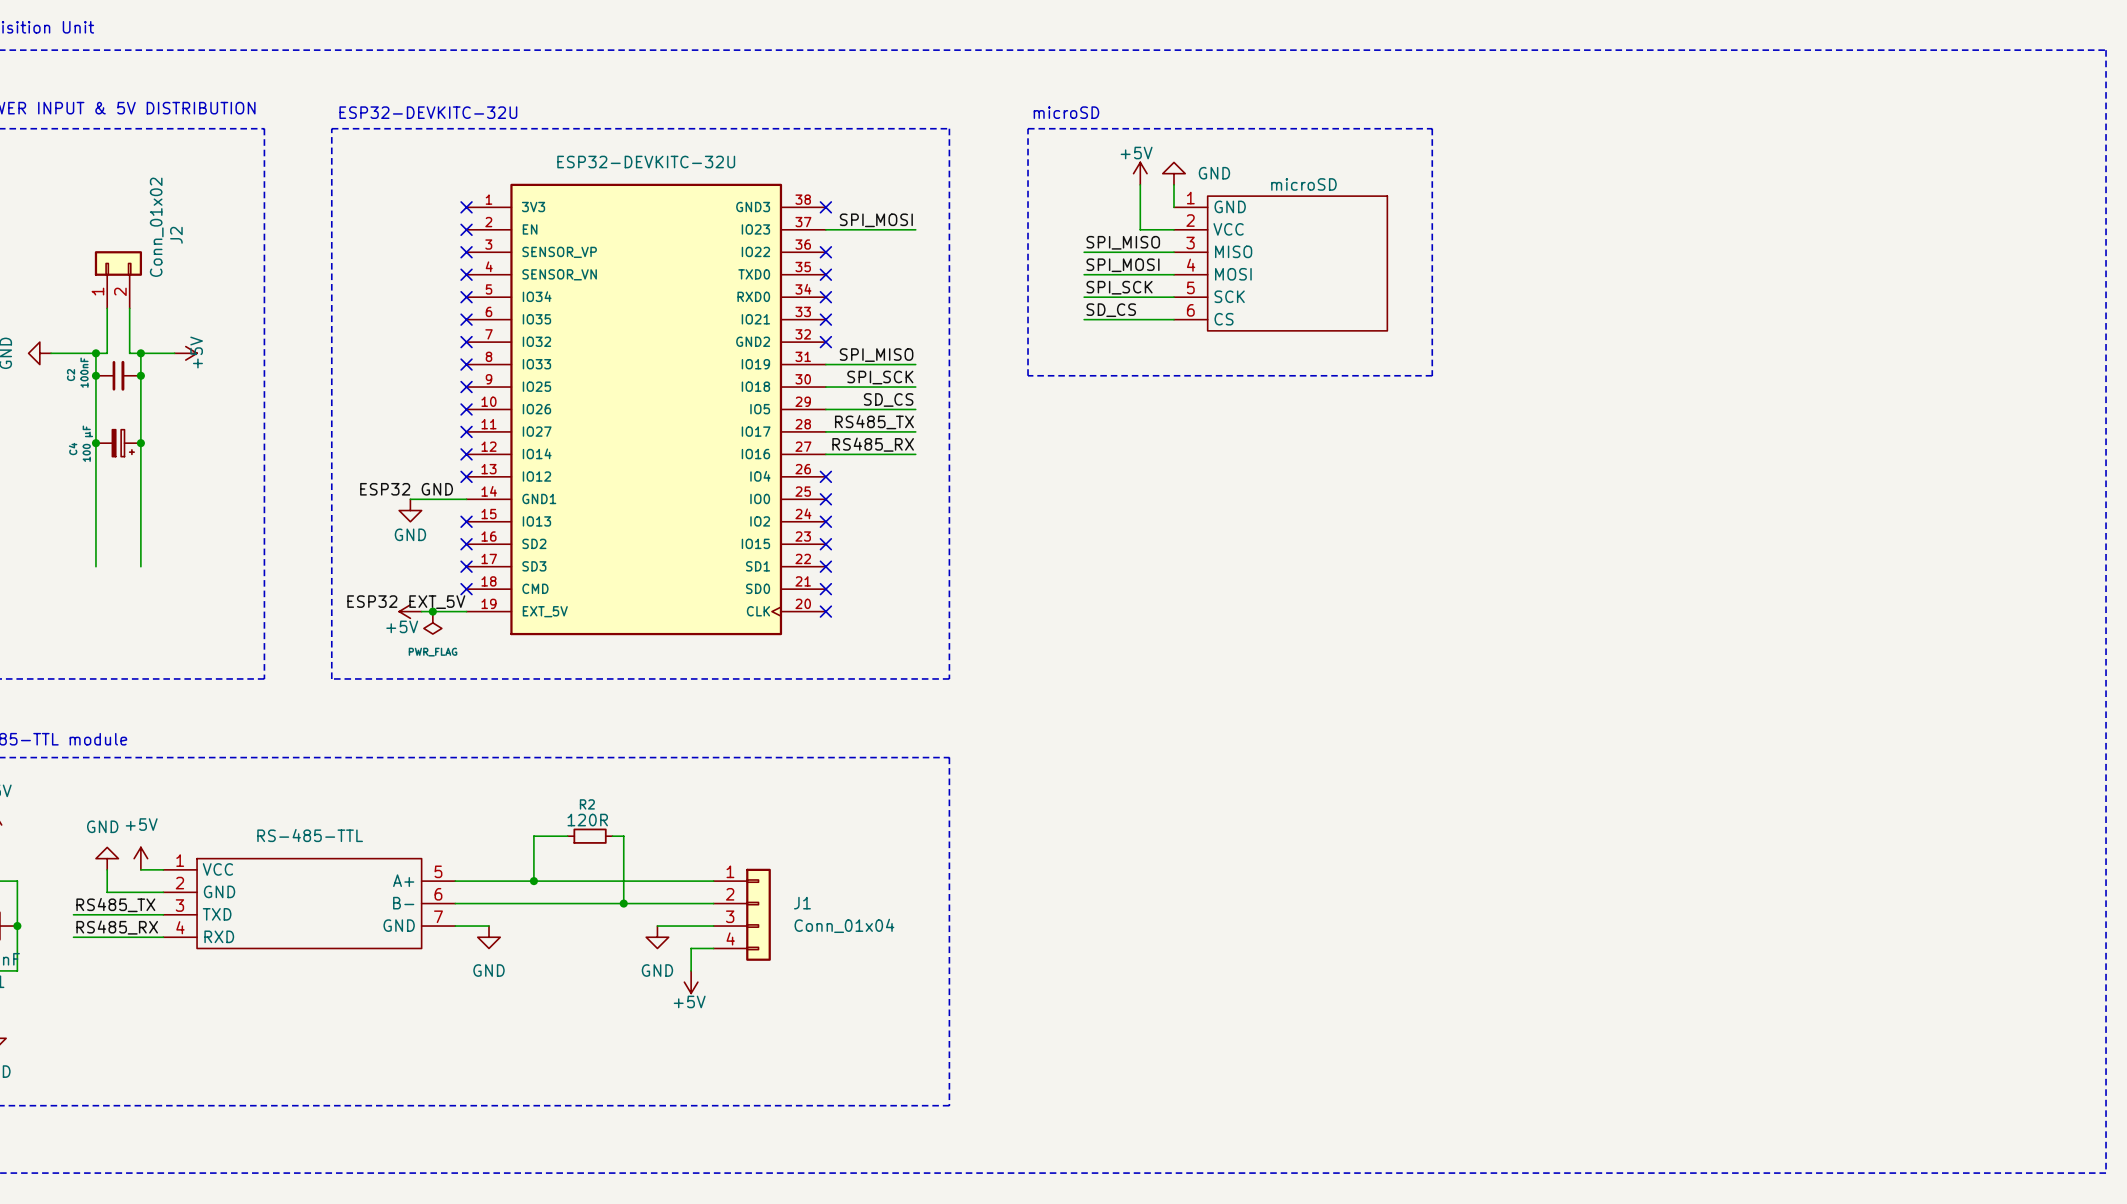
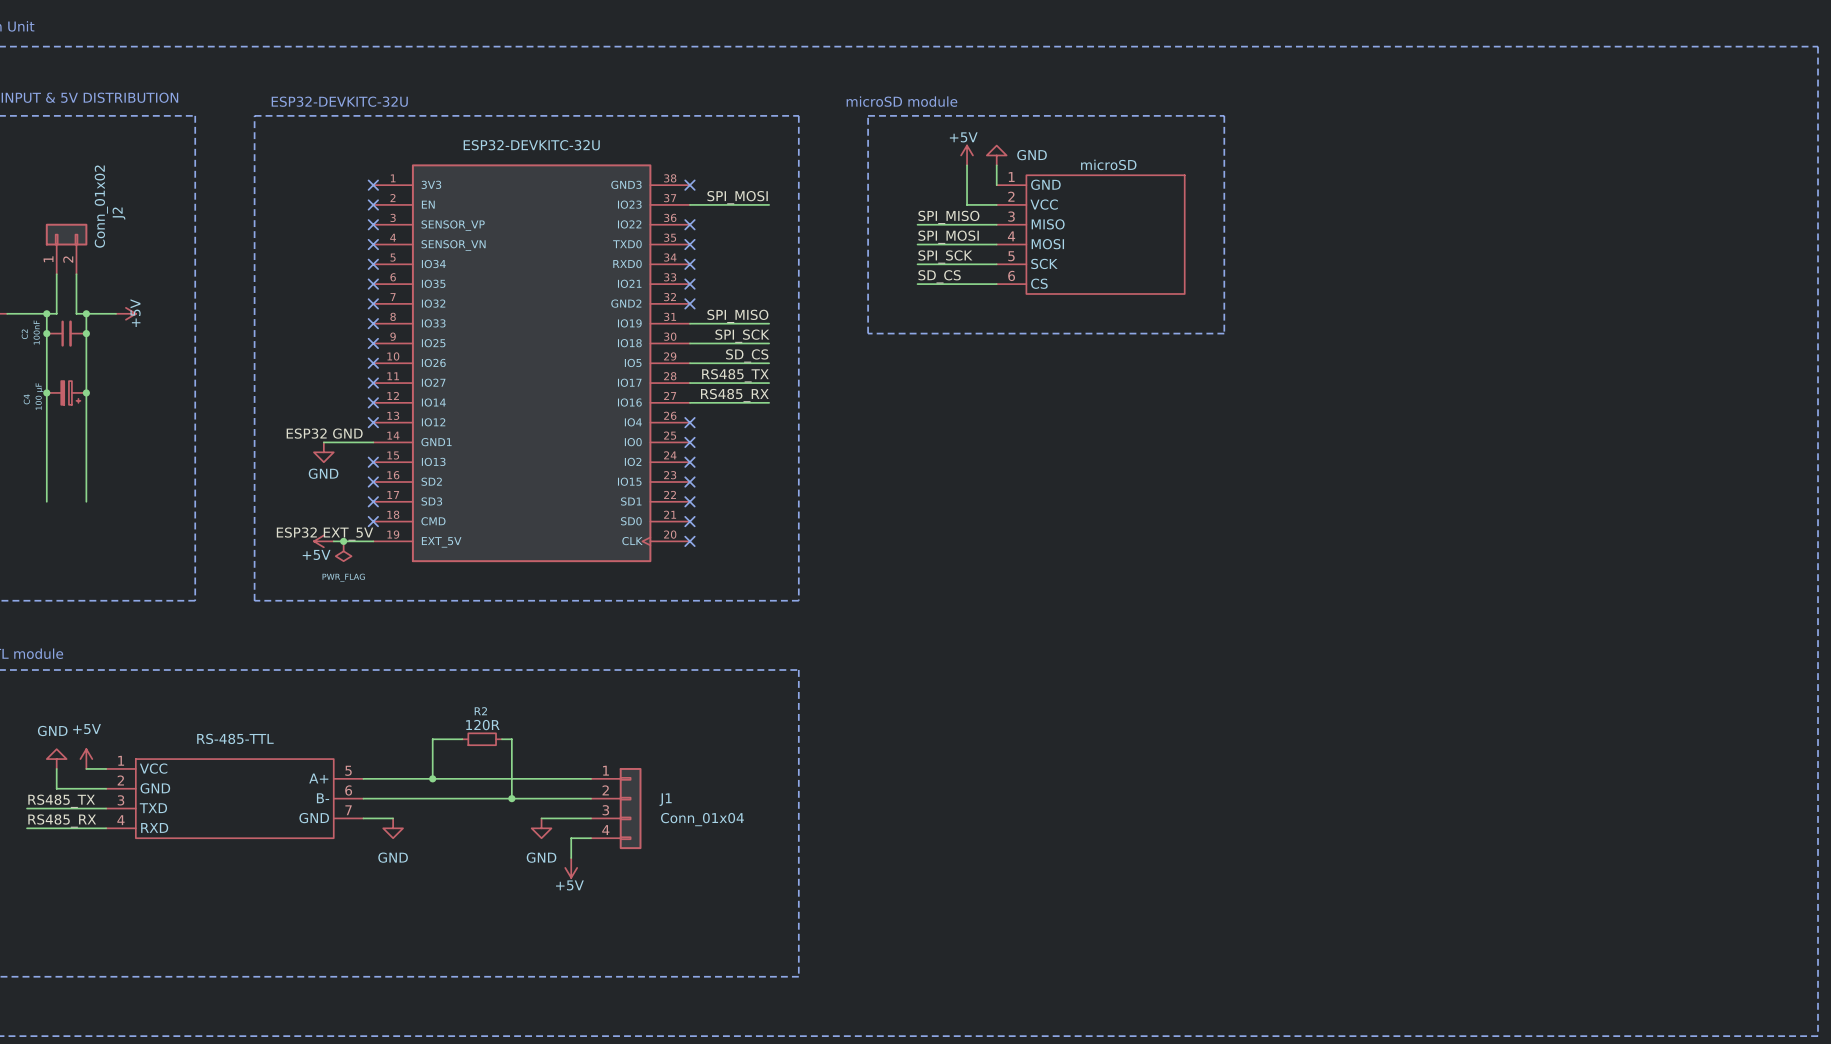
text: microSD (1066, 112) -> microSD module (901, 101)

